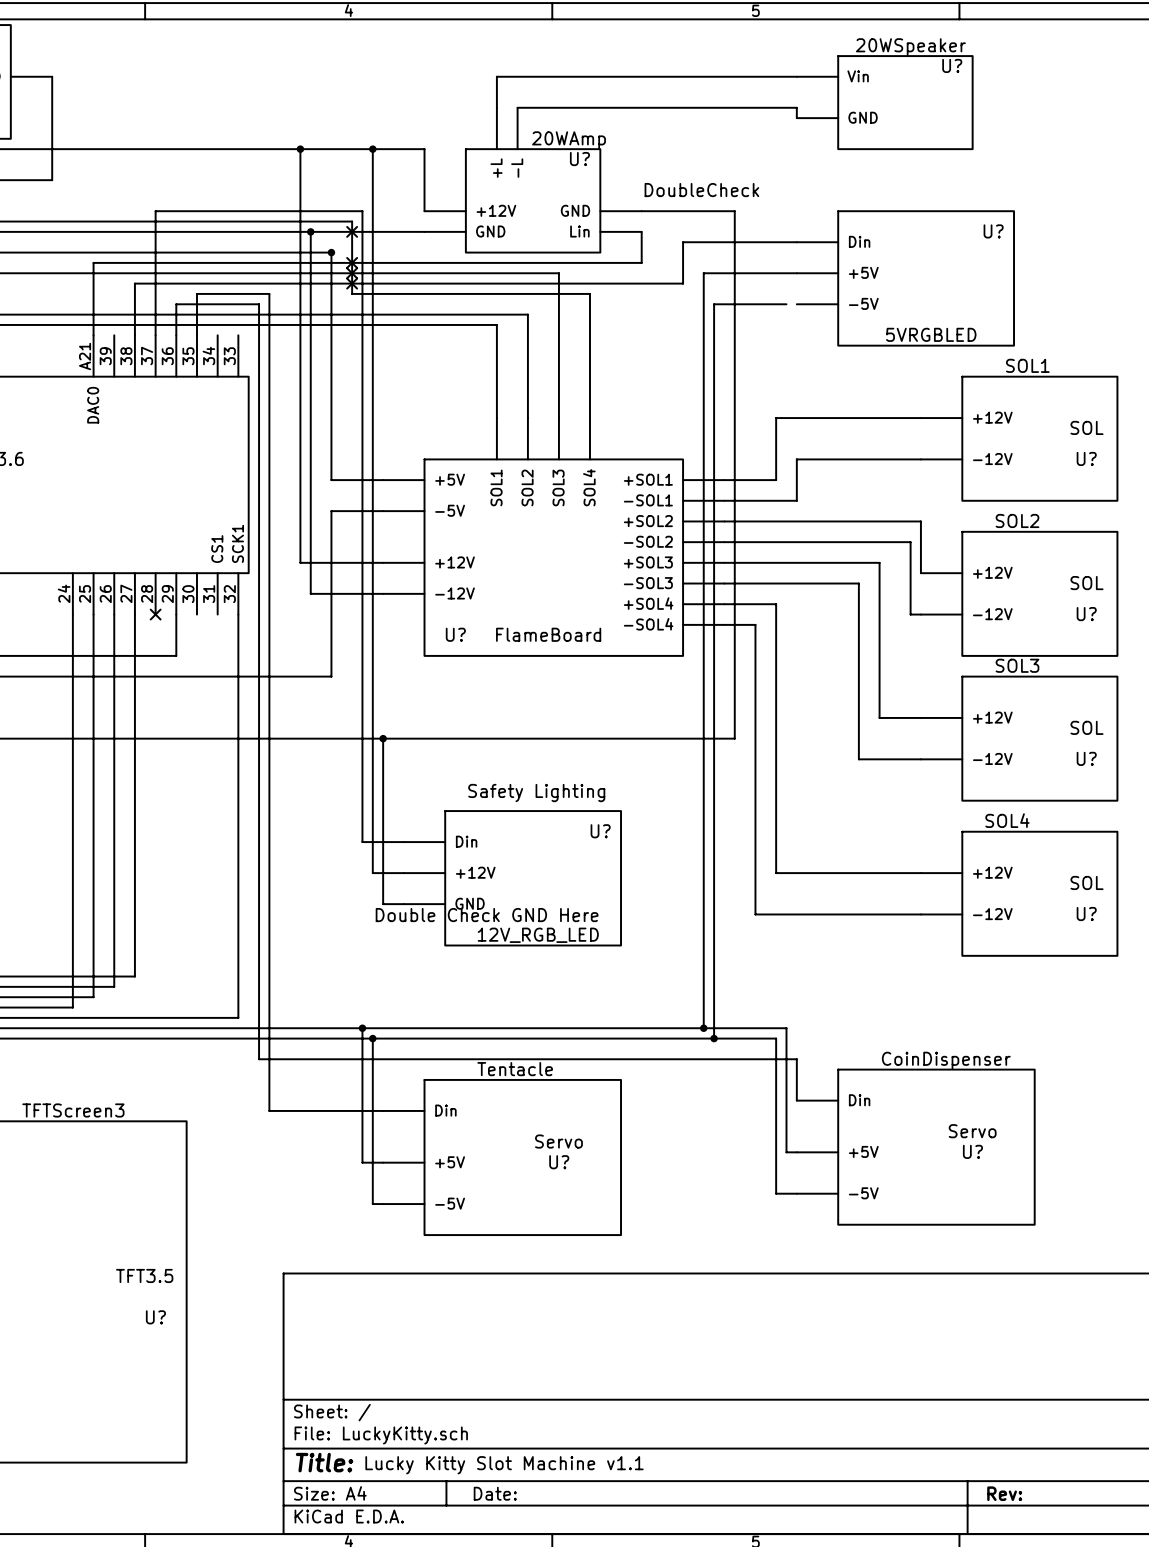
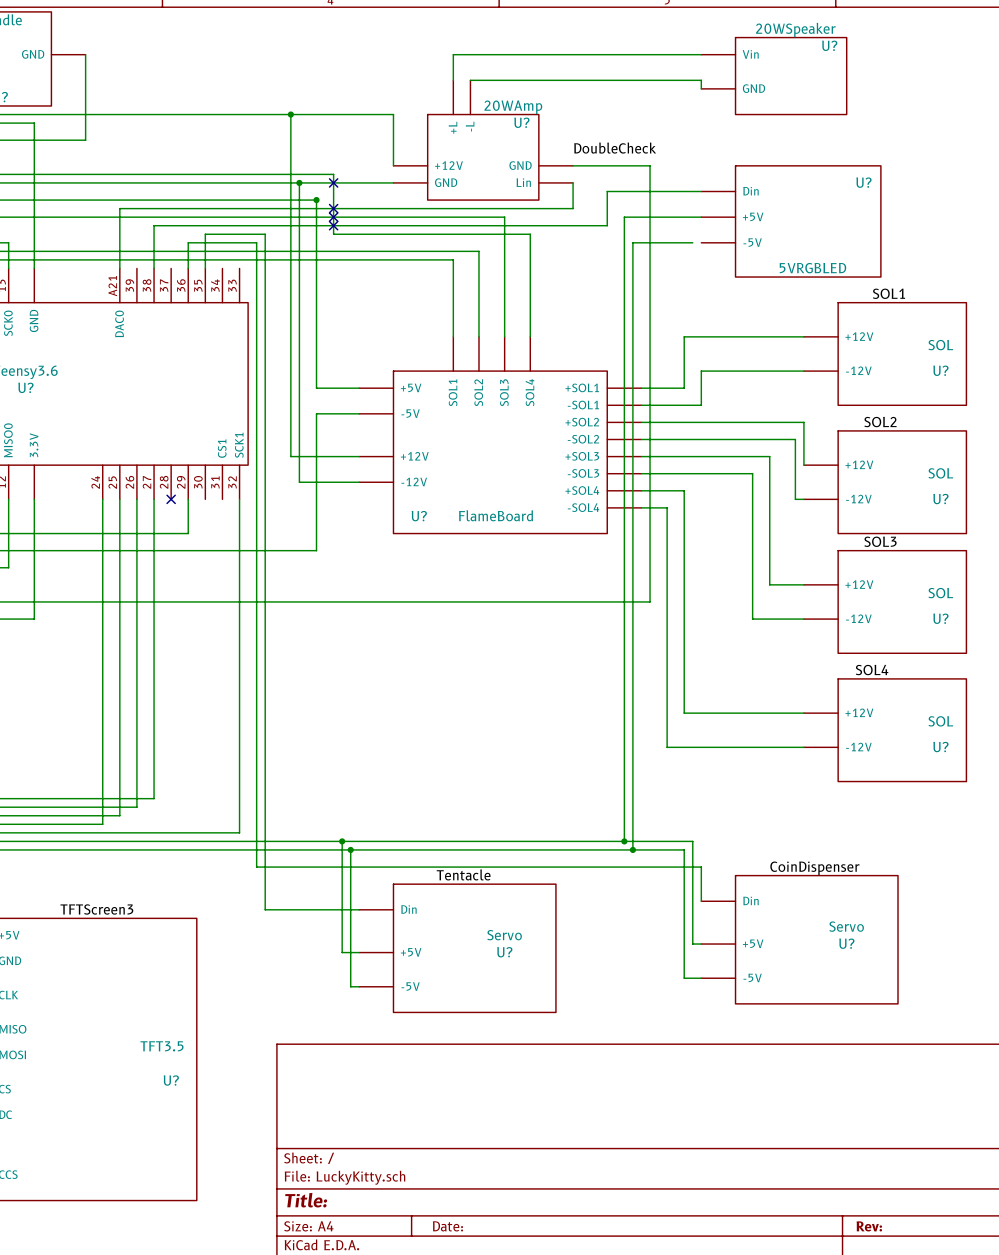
wire: (372, 149) (372, 873) (403, 873) -> none
junction: (372, 149) -> none
wire: (155, 335) (155, 211) (362, 211) (362, 842) (403, 842) -> none
wire: (383, 738) (383, 904) (403, 904) -> none
junction: (383, 738) -> none
text: Safety Lighting (536, 793) -> none
U?: 12V_RGB_LED (512, 878) -> none
text: Double Check GND Here (487, 915) -> none
text: Lucky Kitty Slot Machine v1.1 (504, 1465) -> none

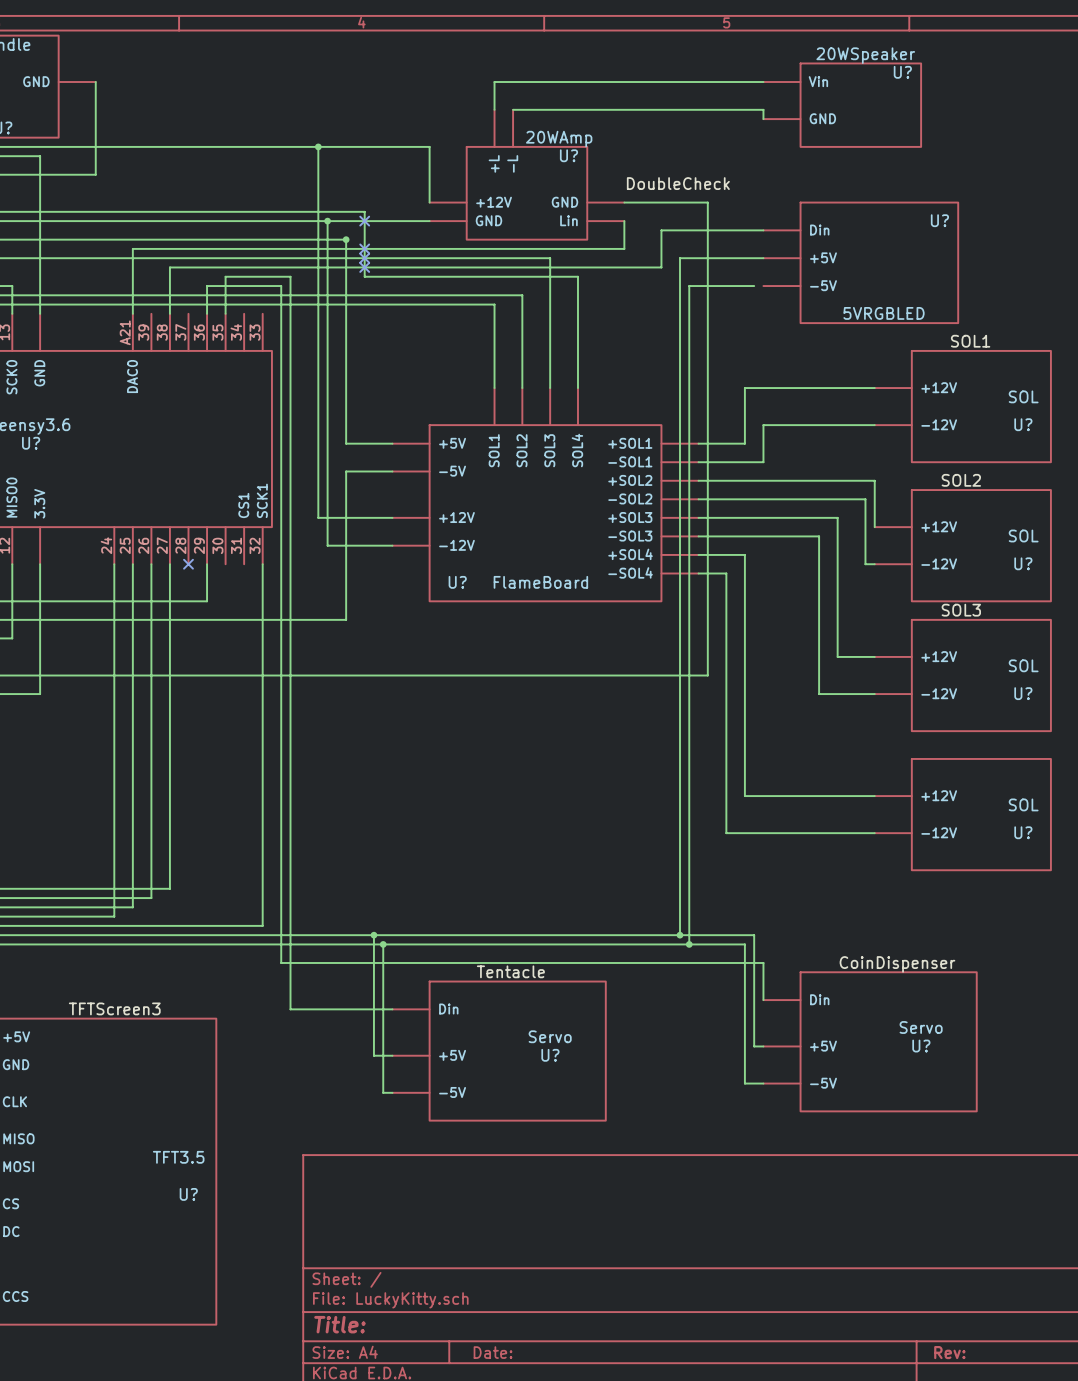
label: SOL4 (872, 670) -> none

